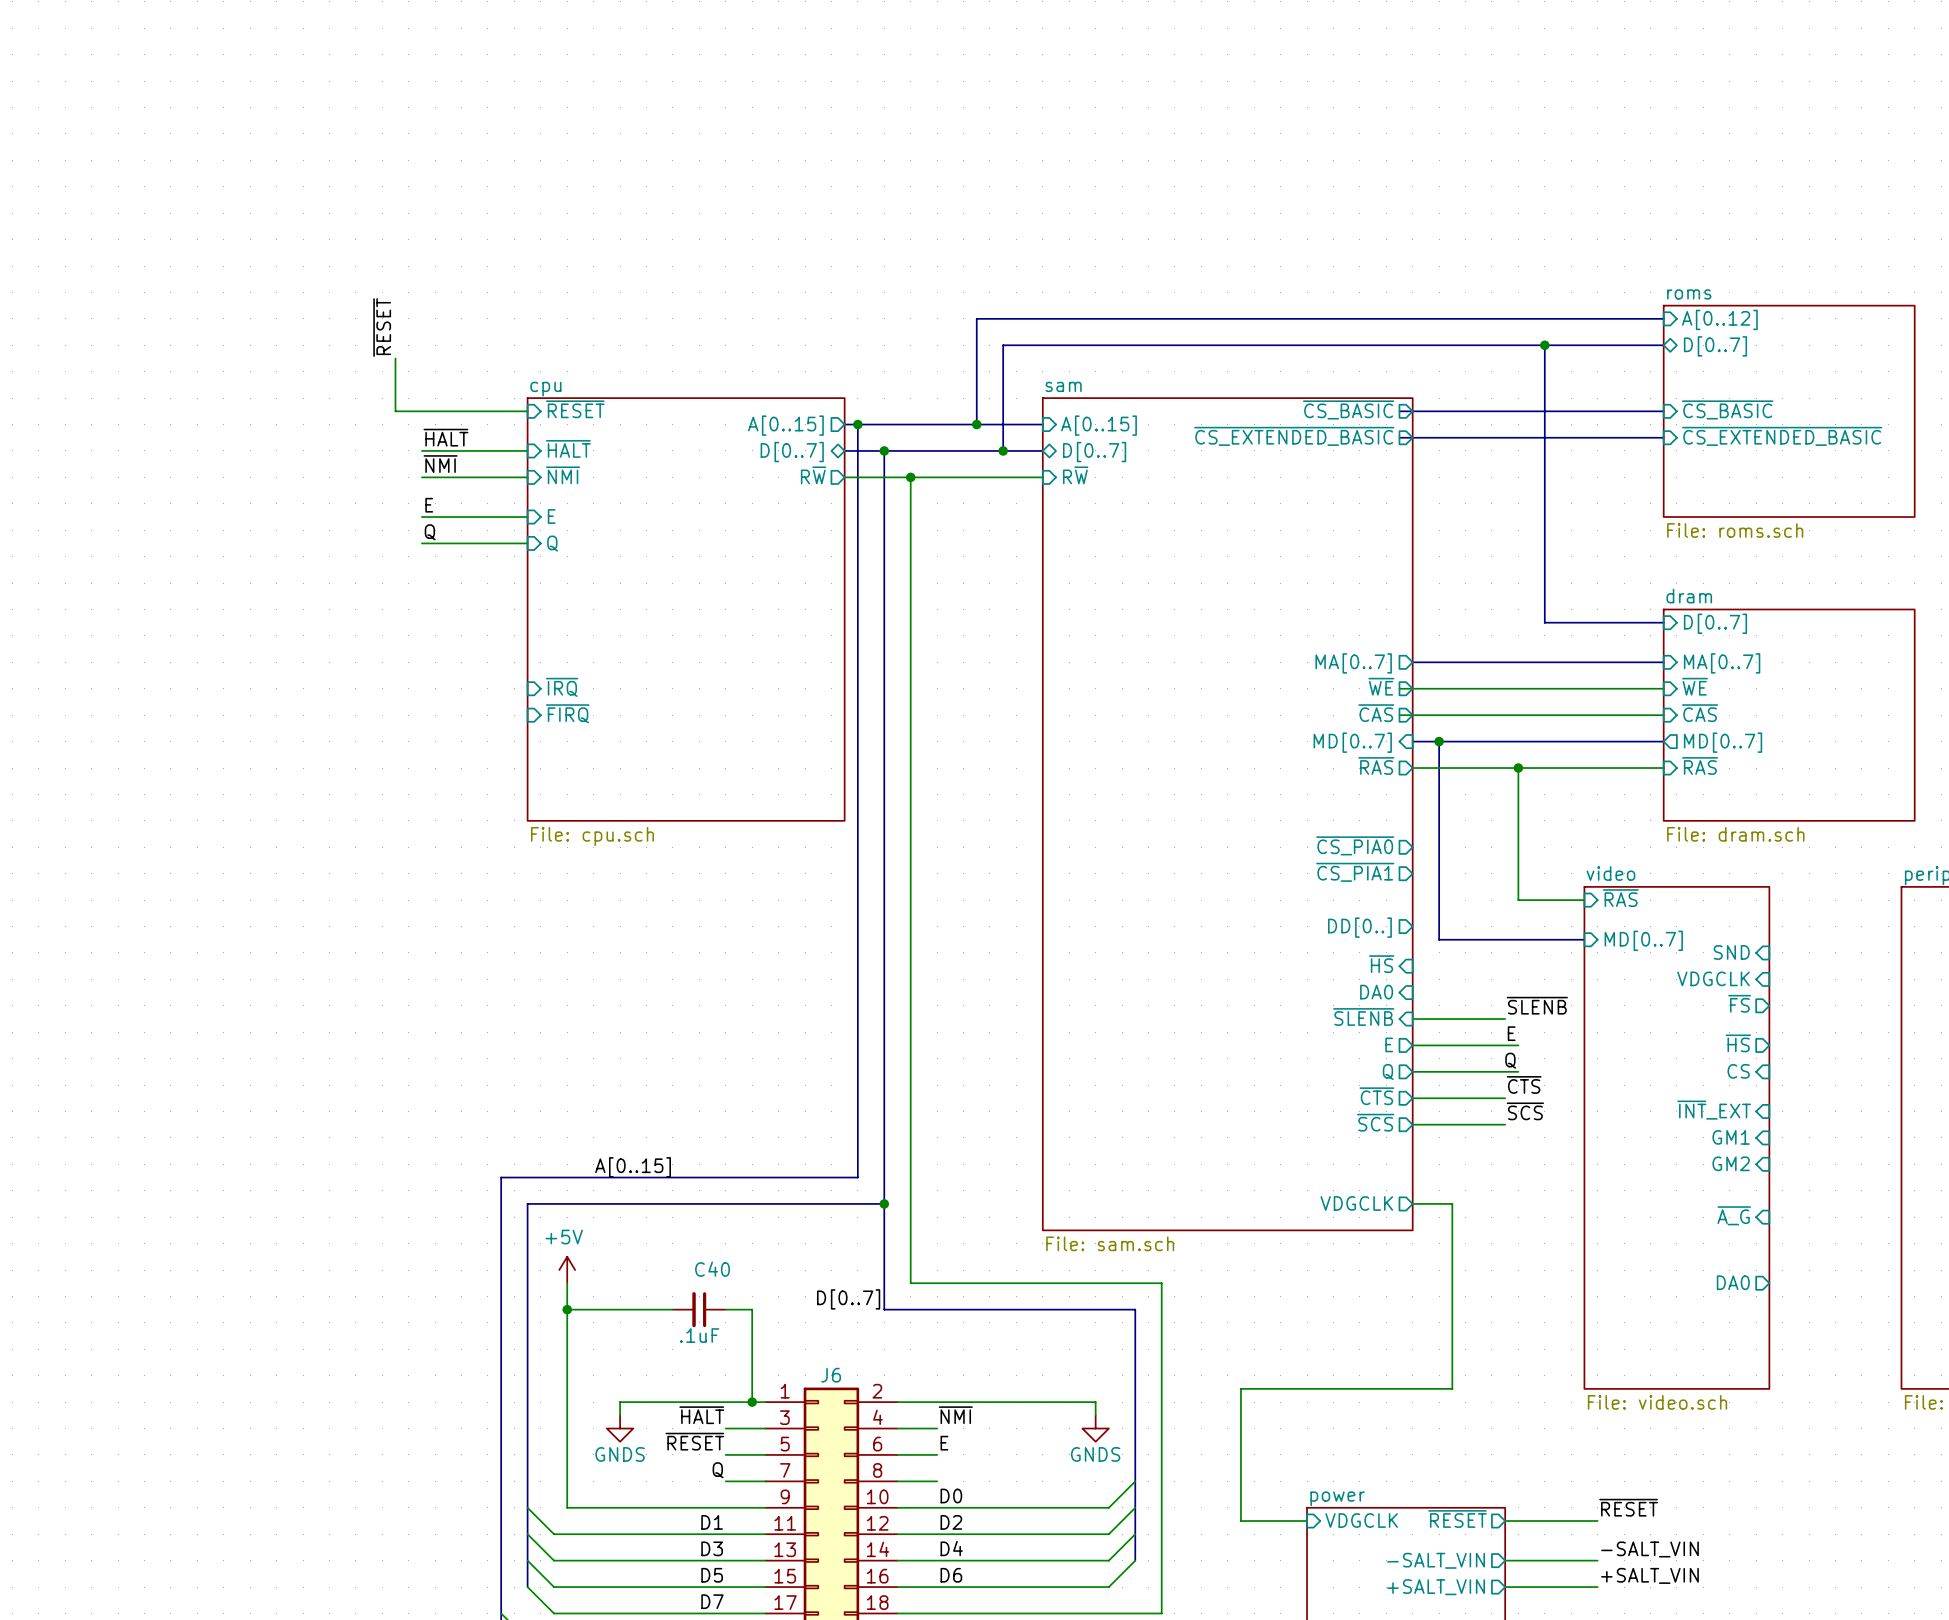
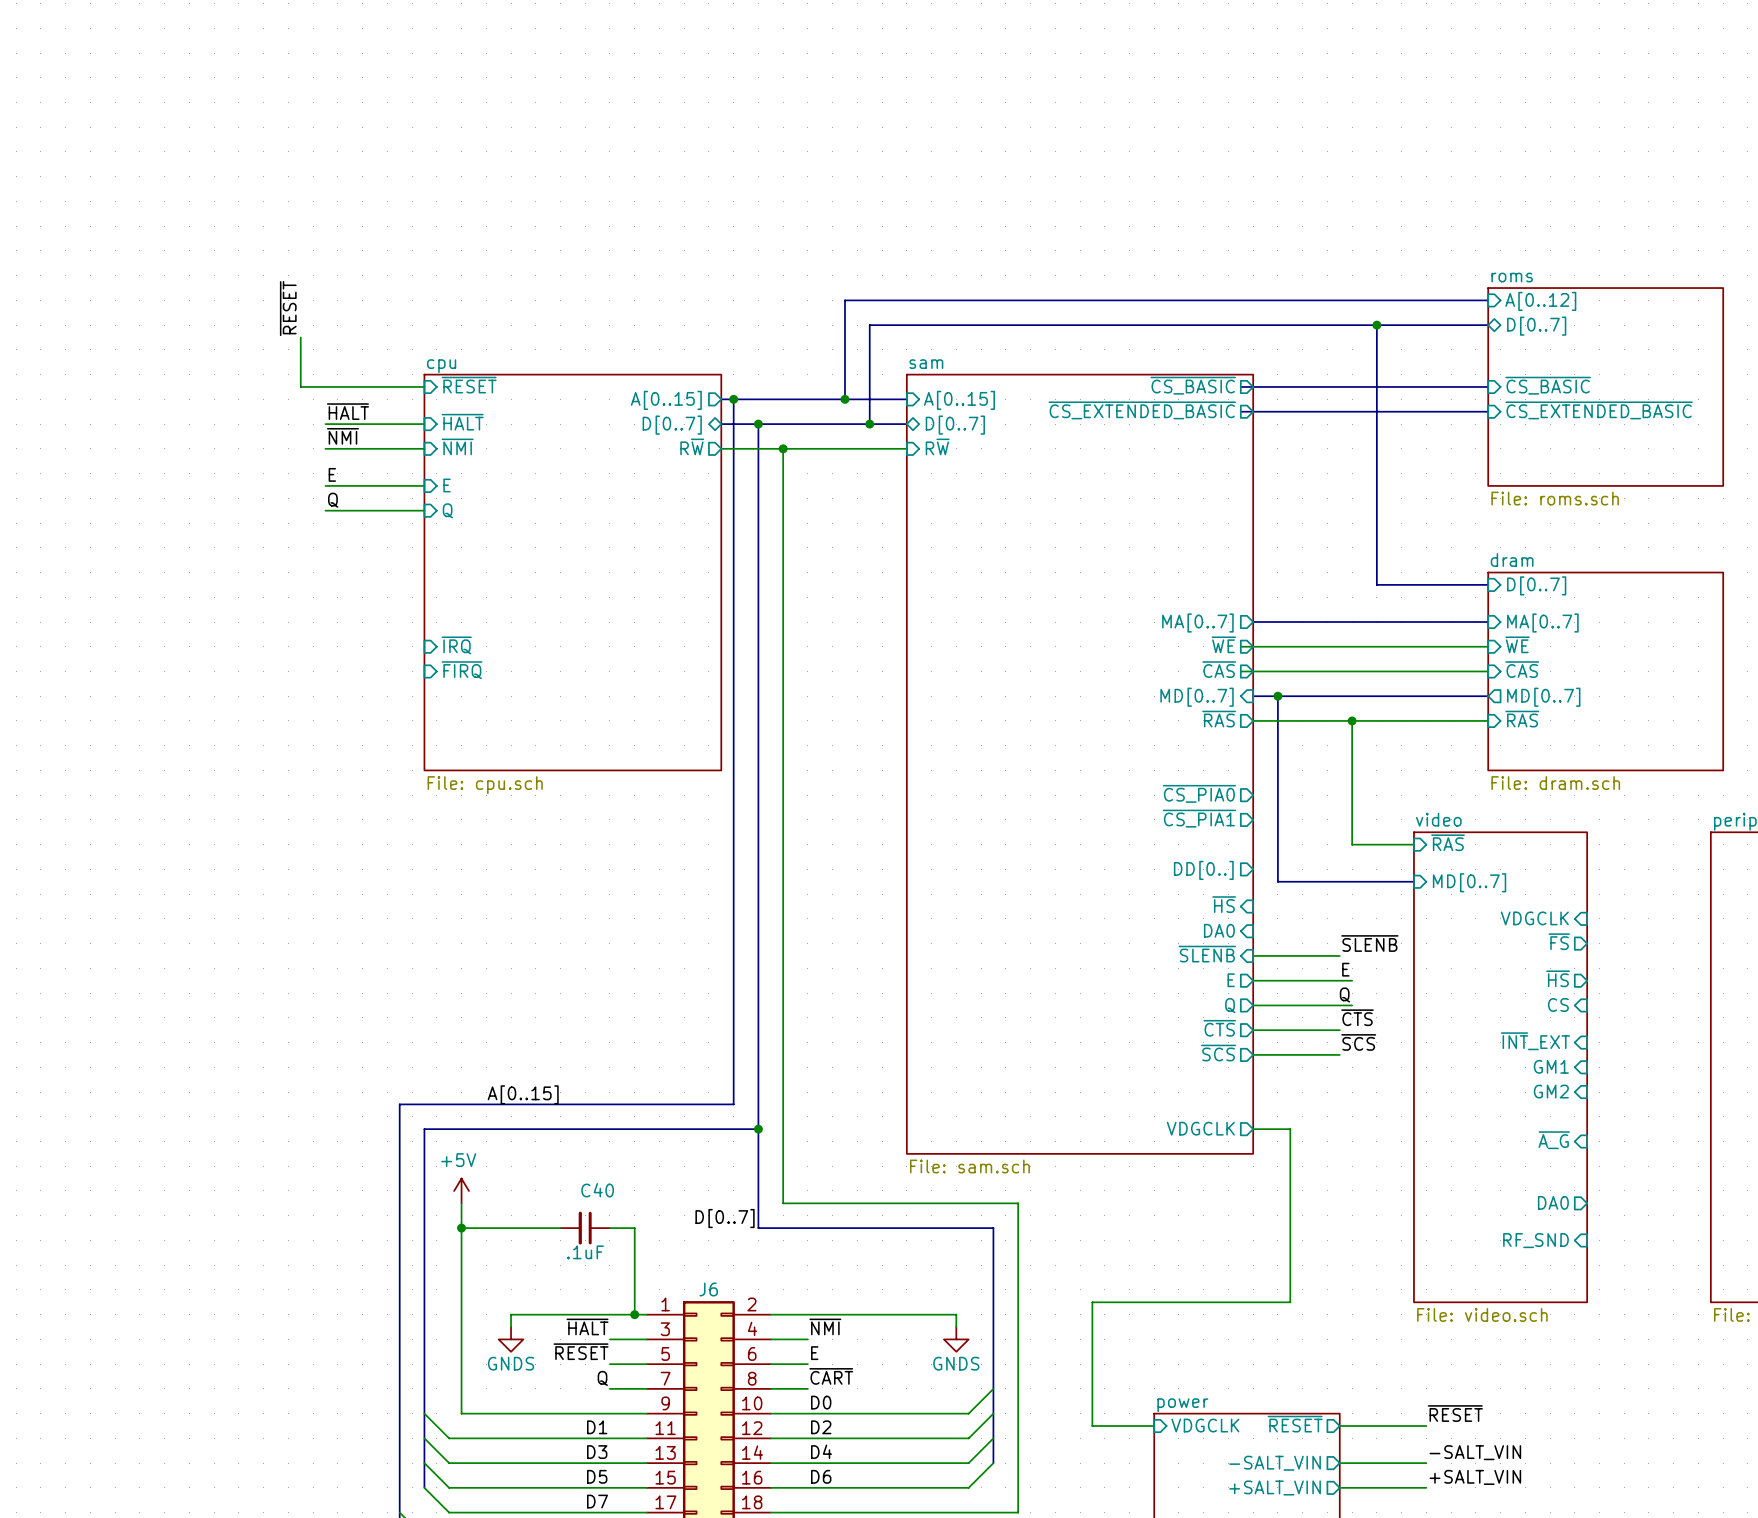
sheet pin: SND (1731, 952) -> none
sheet pin: none -> RF_SND (1536, 1240)
label: none -> ~{CART} (831, 1376)

